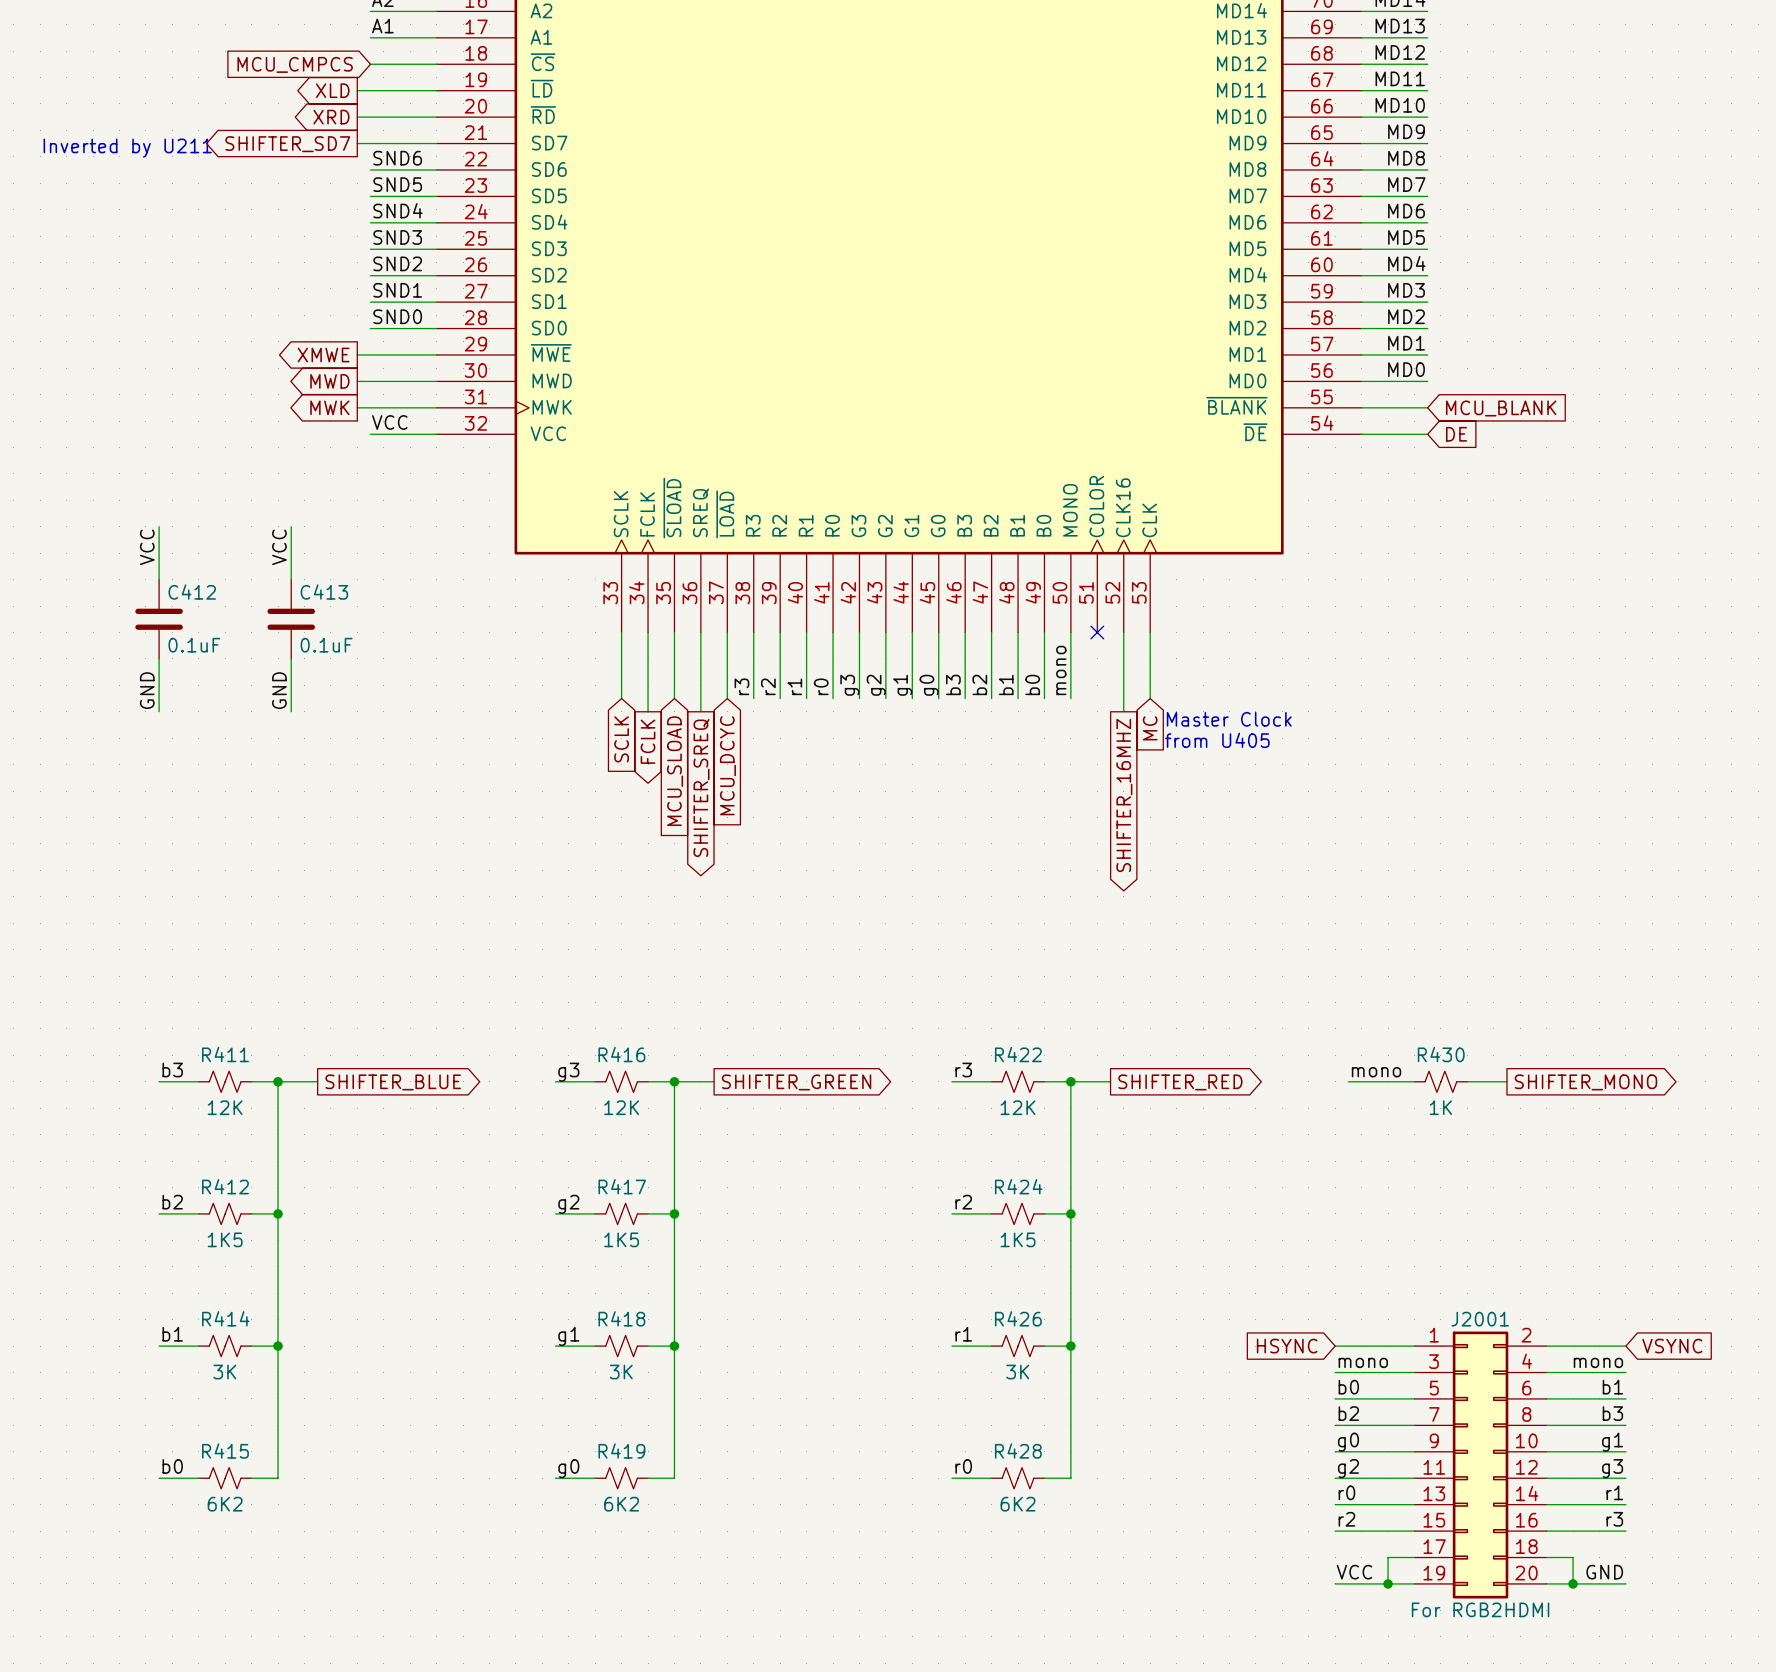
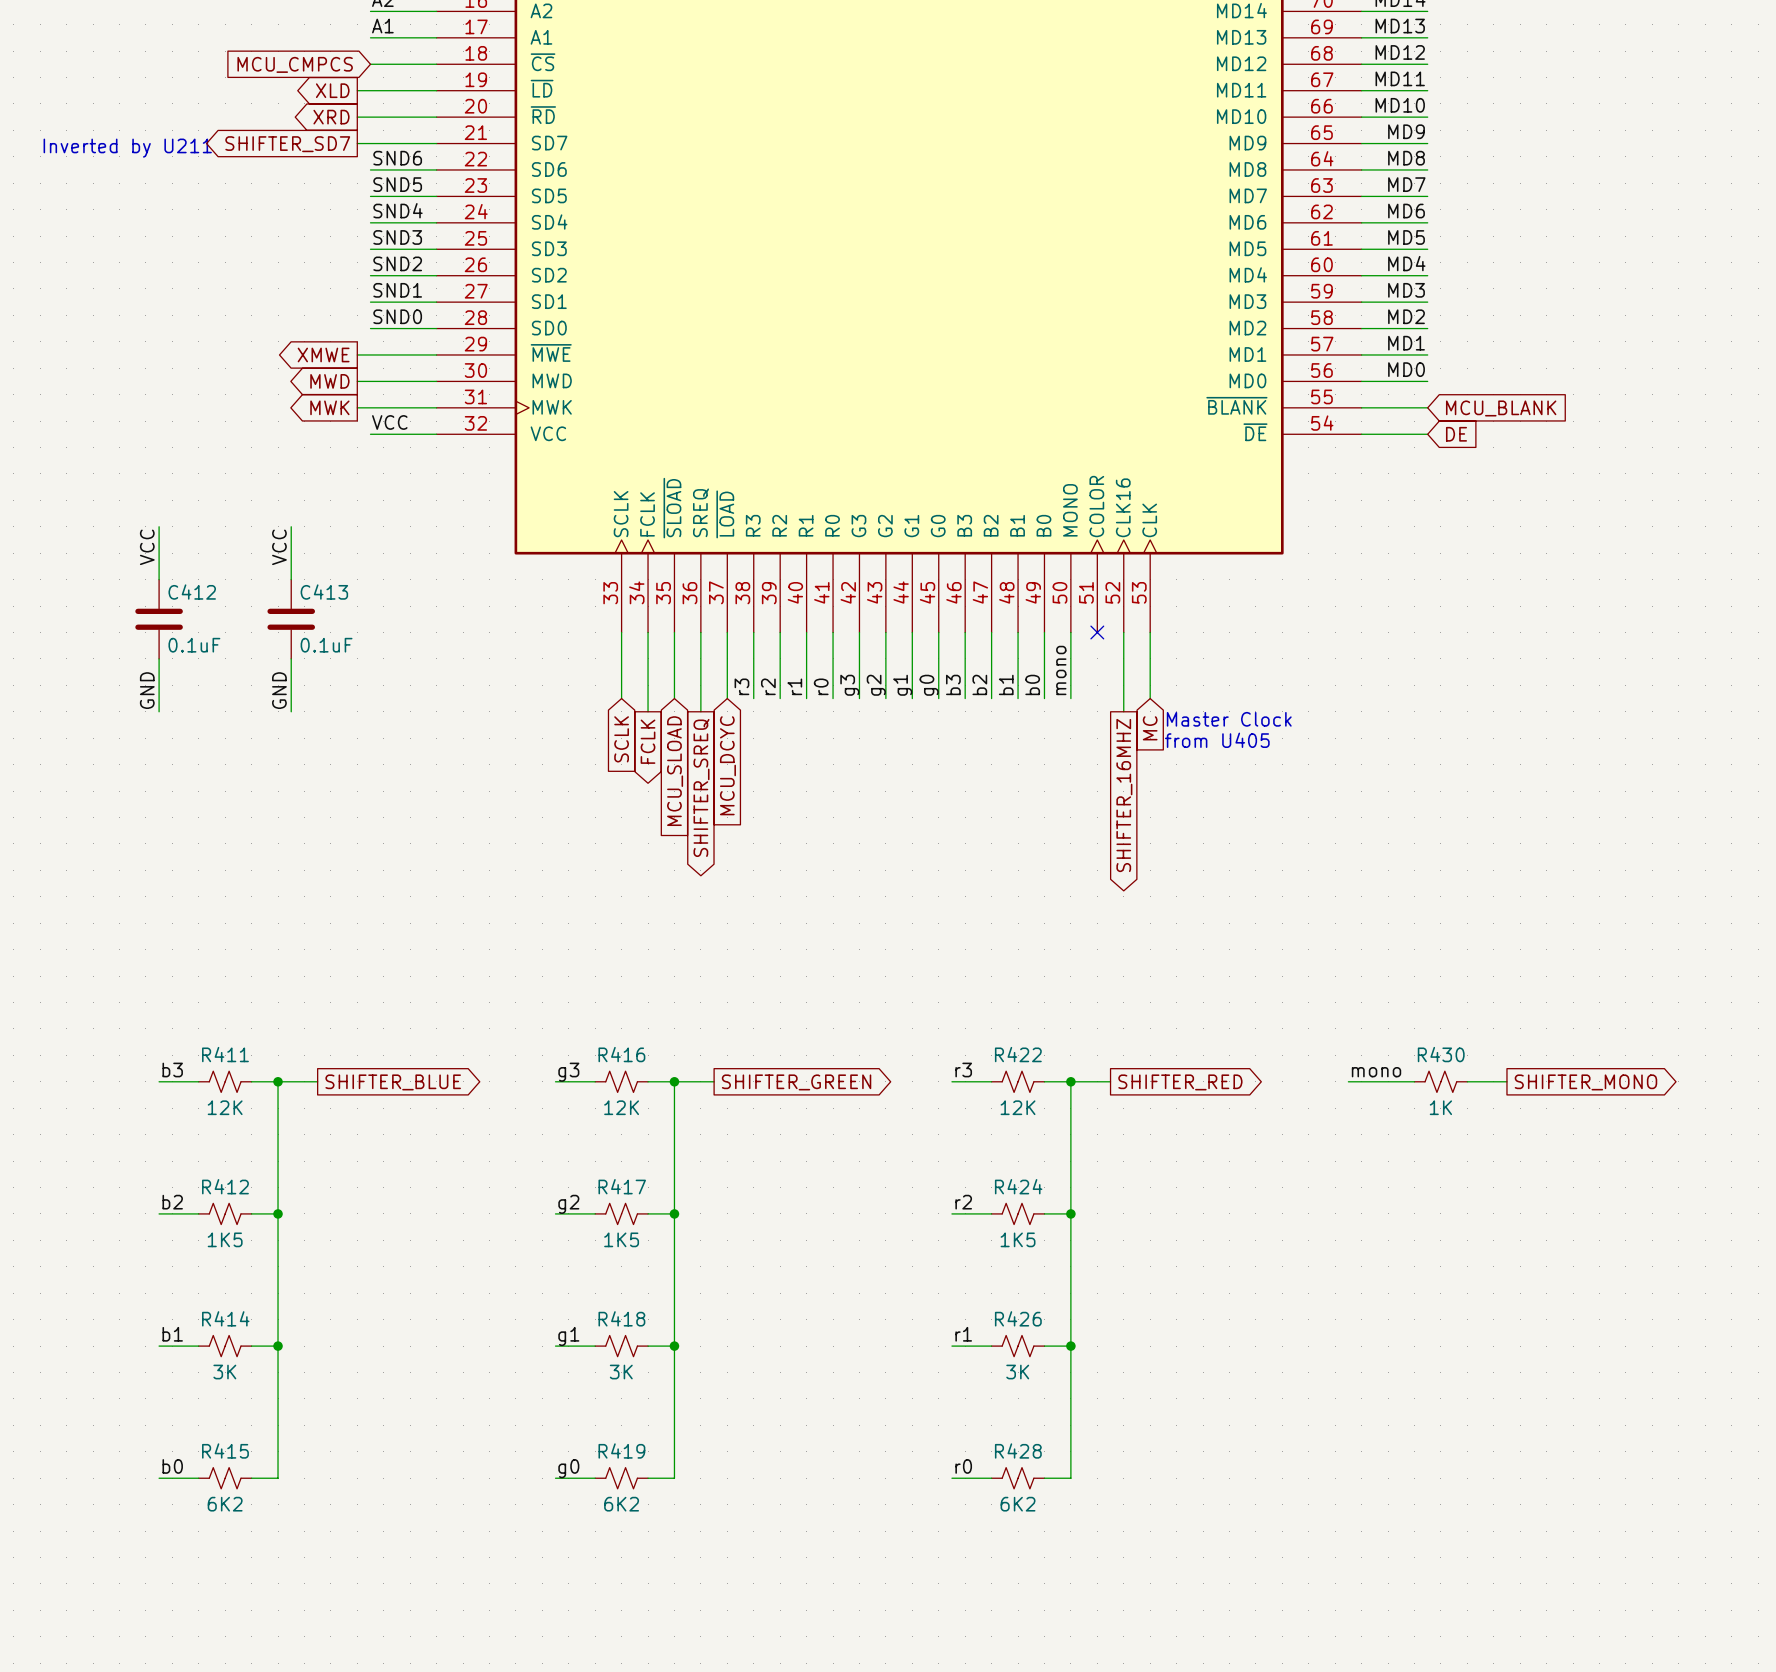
global label: HSYNC (1287, 1346) -> none
wire: (1335, 1346) (1414, 1346) -> none
wire: (1546, 1346) (1625, 1346) -> none
global label: VSYNC (1672, 1346) -> none
label: mono (1363, 1362) -> none
label: mono (1598, 1362) -> none
wire: (1335, 1372) (1414, 1372) -> none
wire: (1546, 1372) (1625, 1372) -> none
label: b0 (1348, 1387) -> none
label: b1 (1612, 1387) -> none
wire: (1335, 1398) (1414, 1398) -> none
wire: (1546, 1398) (1625, 1398) -> none
label: b2 (1348, 1413) -> none
label: b3 (1612, 1413) -> none
wire: (1335, 1425) (1414, 1425) -> none
wire: (1546, 1425) (1625, 1425) -> none
label: g0 (1348, 1442) -> none
label: g1 (1612, 1442) -> none
wire: (1335, 1451) (1414, 1451) -> none
wire: (1546, 1451) (1625, 1451) -> none
J2001: For RGB2HDMI (1480, 1465) -> none
label: g2 (1348, 1468) -> none
label: g3 (1612, 1468) -> none
wire: (1335, 1478) (1414, 1478) -> none
wire: (1546, 1478) (1625, 1478) -> none
label: r0 (1346, 1492) -> none
label: r1 (1614, 1492) -> none
wire: (1335, 1504) (1414, 1504) -> none
wire: (1546, 1504) (1625, 1504) -> none
label: r2 (1346, 1519) -> none
label: r3 (1614, 1519) -> none
wire: (1335, 1531) (1414, 1531) -> none
wire: (1546, 1531) (1625, 1531) -> none
wire: (1414, 1557) (1388, 1557) (1388, 1583) -> none
wire: (1546, 1557) (1573, 1557) (1573, 1583) -> none
label: VCC (1354, 1572) -> none
label: GND (1604, 1572) -> none
wire: (1335, 1583) (1414, 1583) -> none
junction: (1388, 1583) -> none
wire: (1546, 1583) (1625, 1583) -> none
junction: (1573, 1583) -> none

